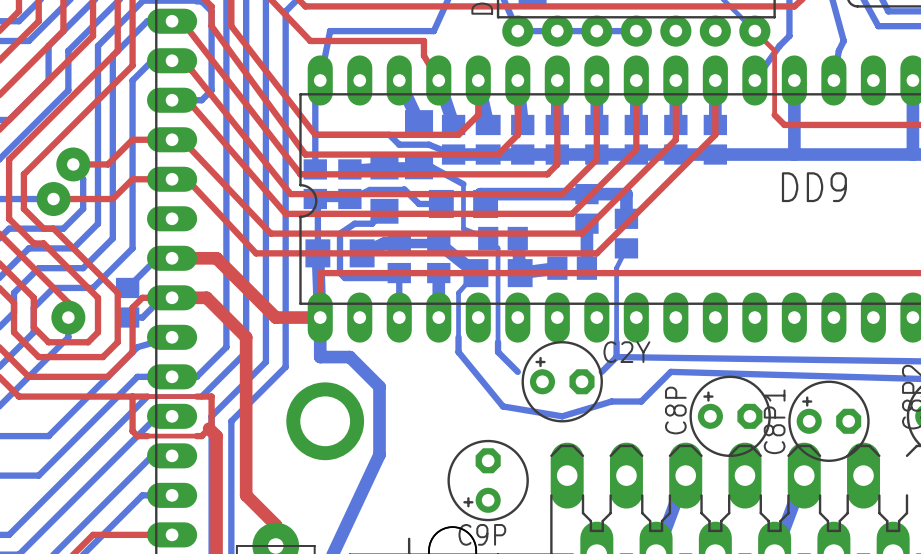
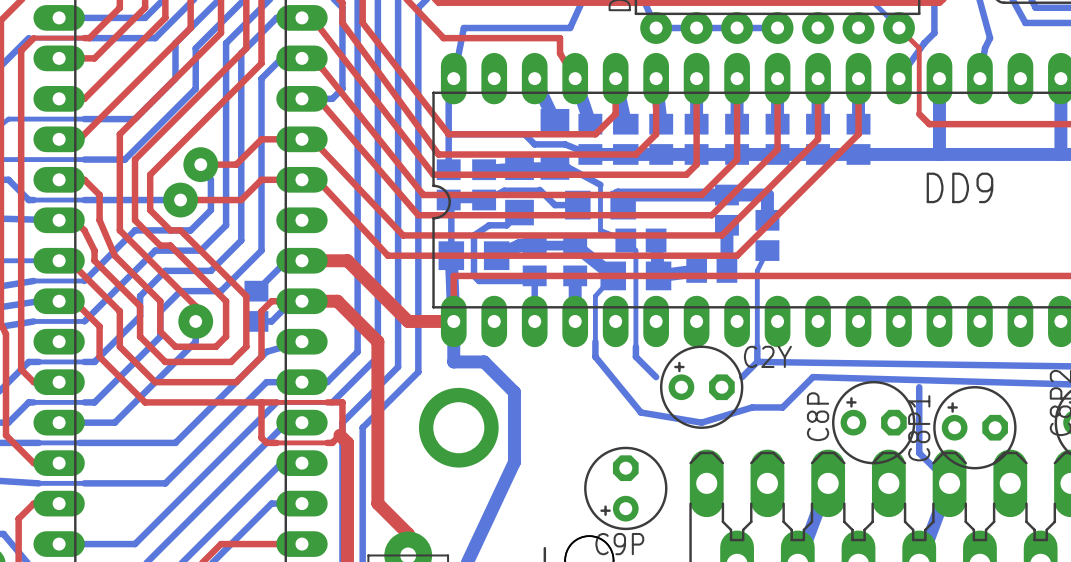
bottom track: none -> (919, 387) (919, 453) (949, 483)

